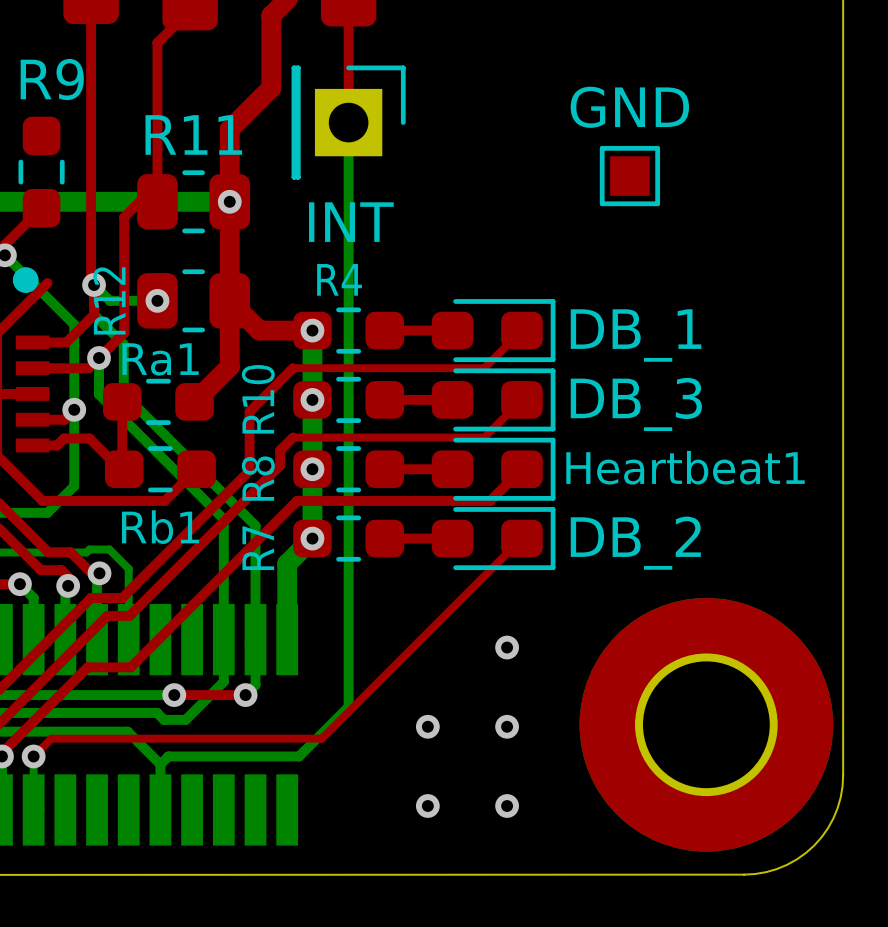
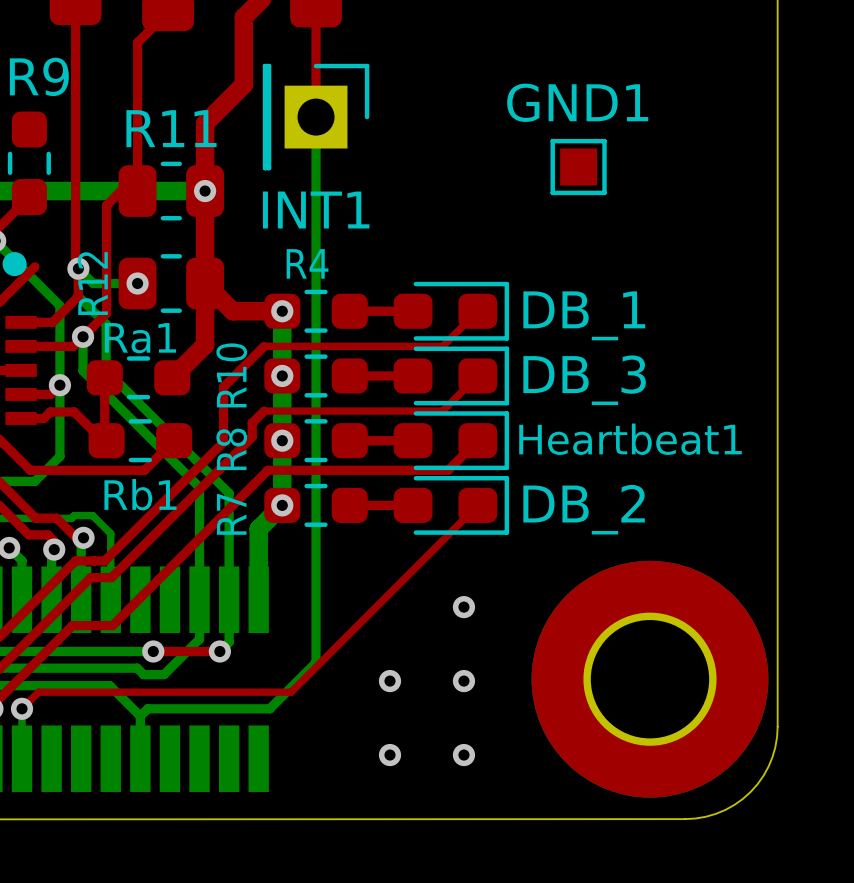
GND name: GND (629, 107) -> GND1 (577, 102)
INT name: INT (351, 222) -> INT1 (316, 210)

